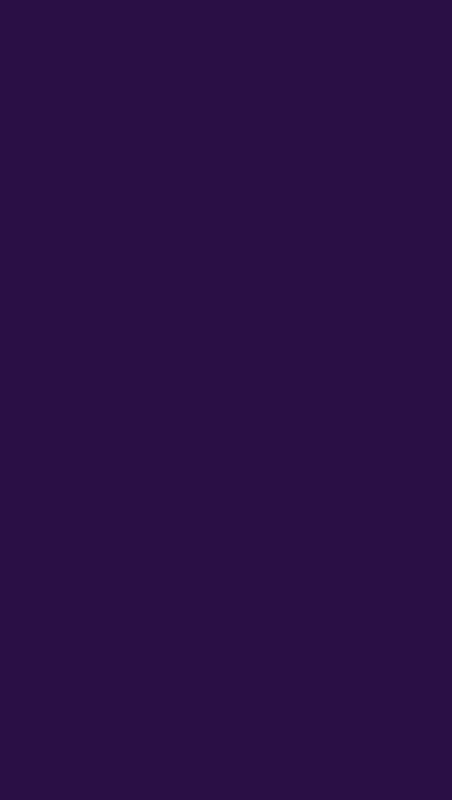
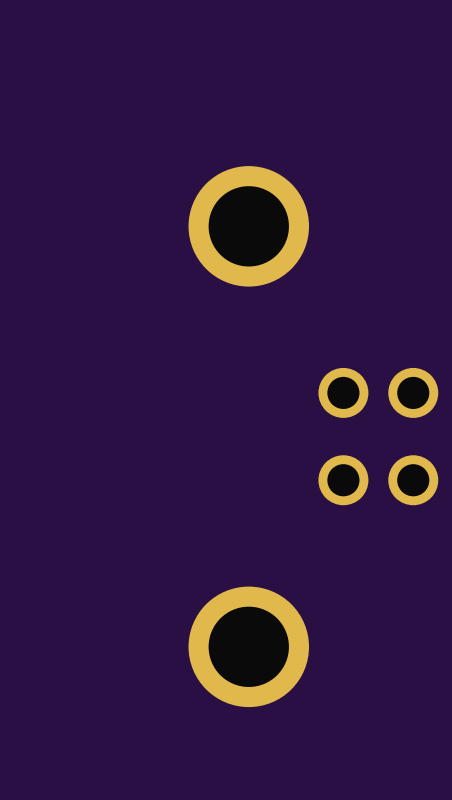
part: none -> (313, 436)

